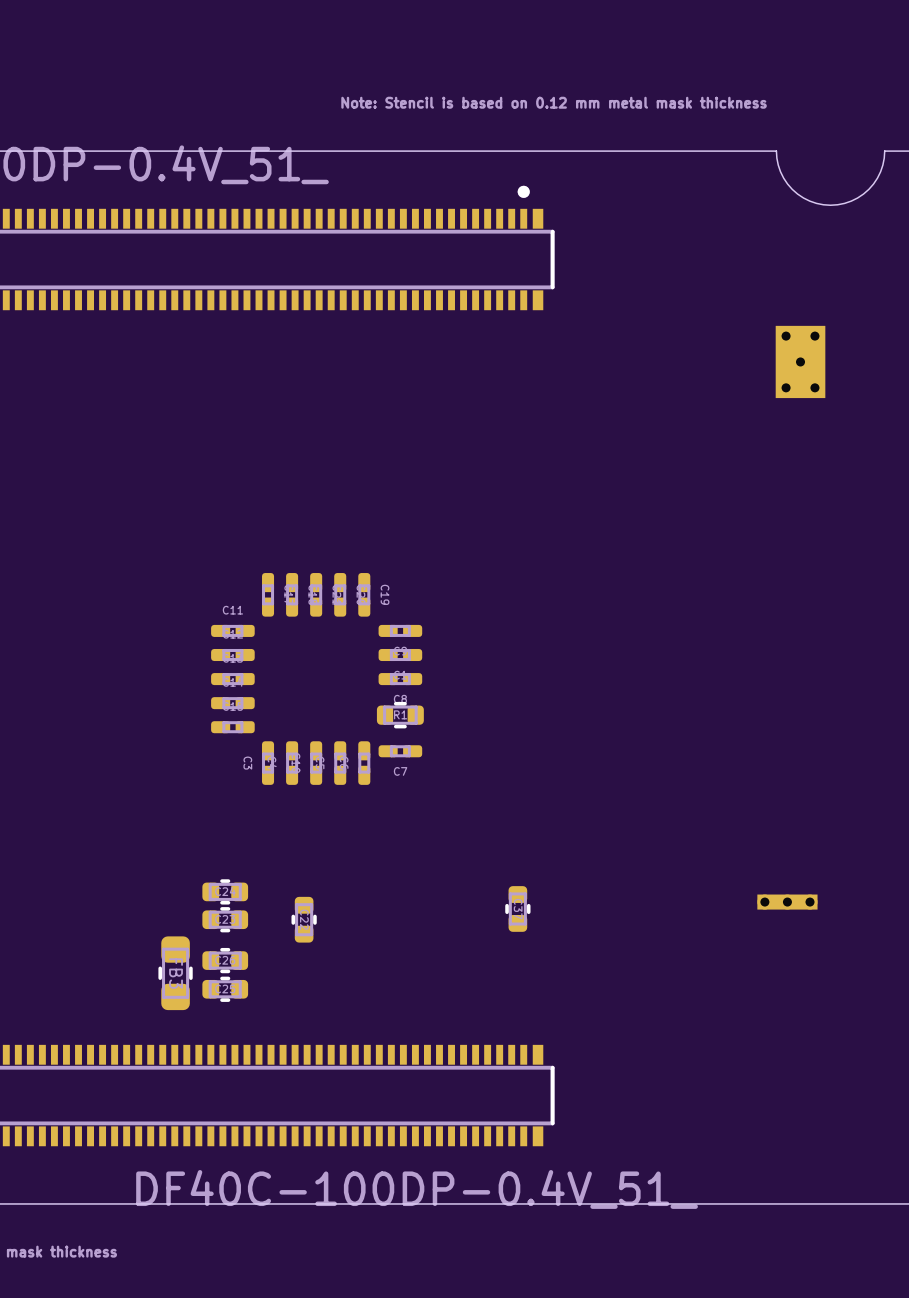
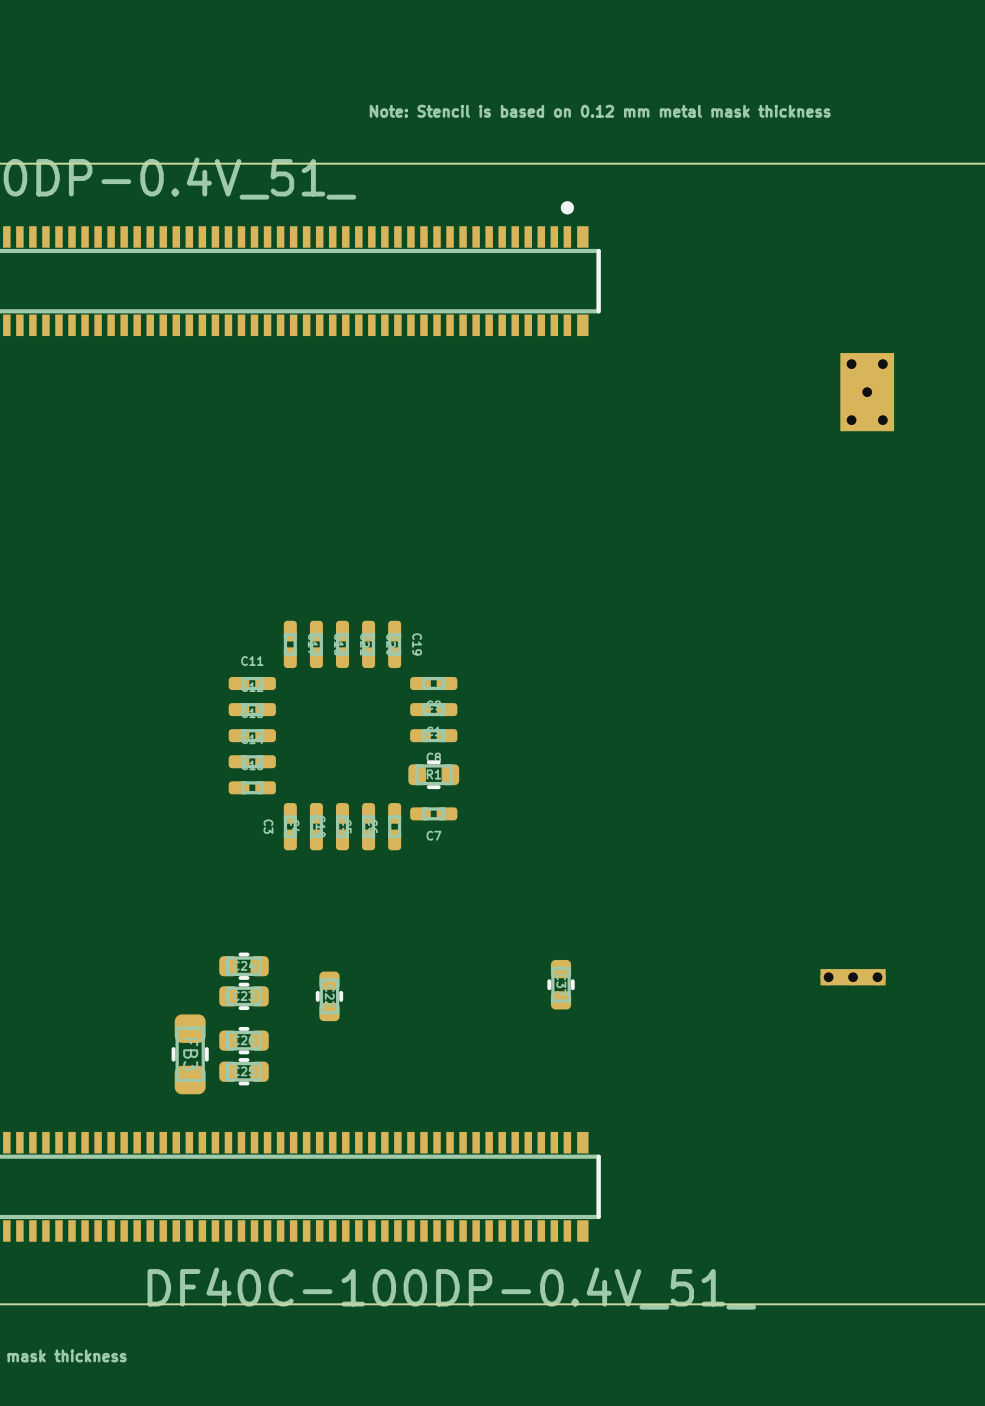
board edge: (884, 151) (880, 171) (868, 189) (851, 201) (830, 205) (809, 201) (792, 189) (780, 171) (776, 151) -> (958, 163) (841, 163)

